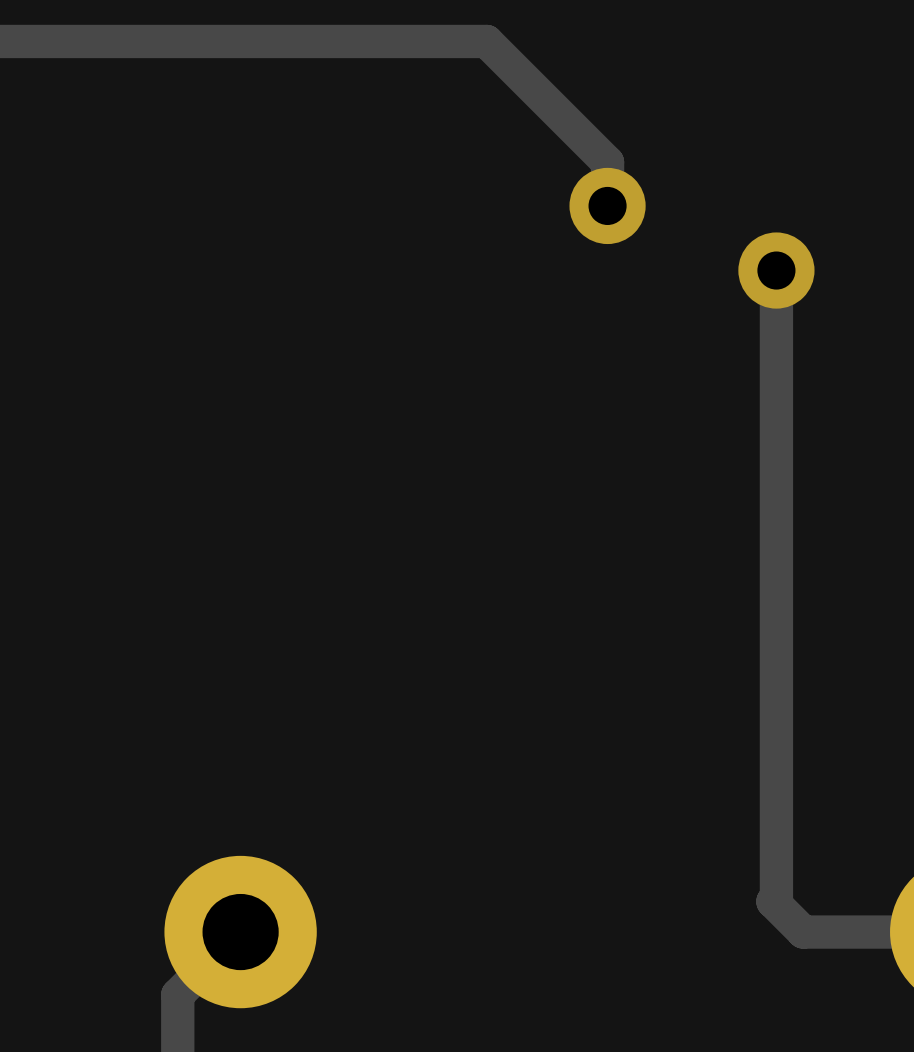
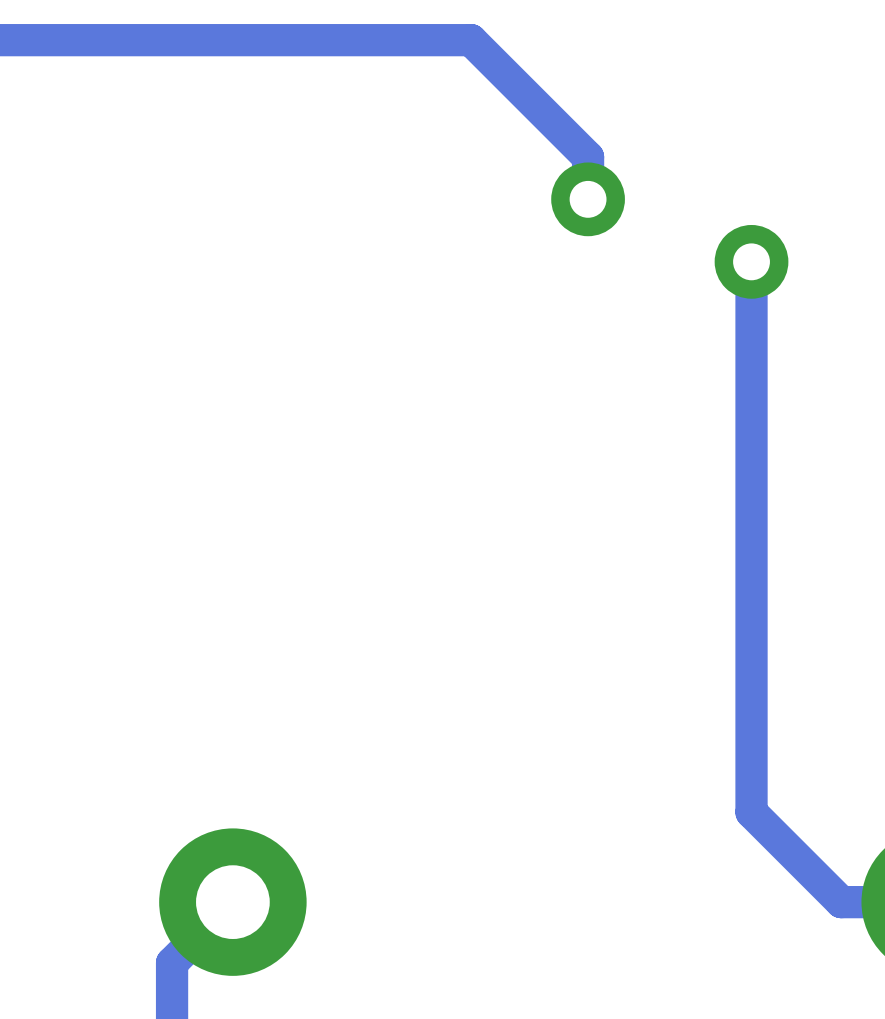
track: (776, 839) (776, 898) (772, 901) (803, 932) (869, 932) -> (751, 812) (841, 902)

